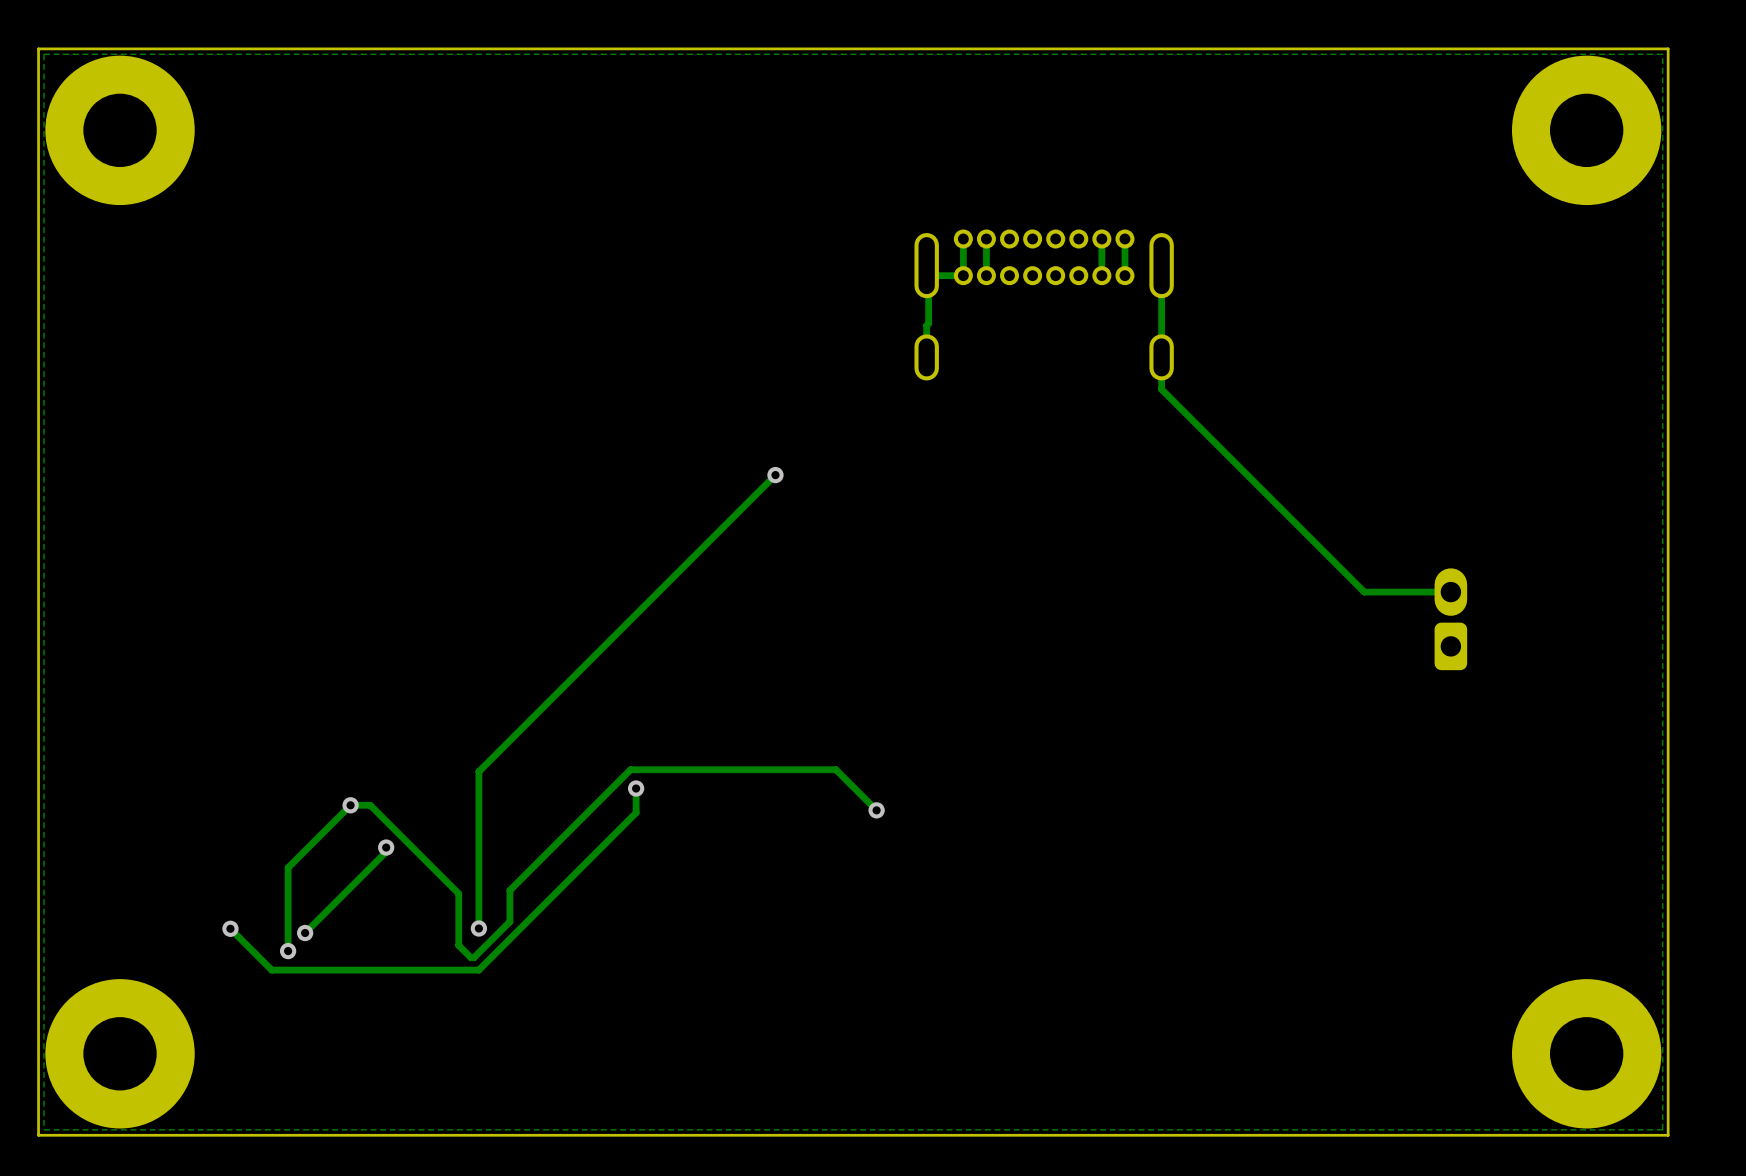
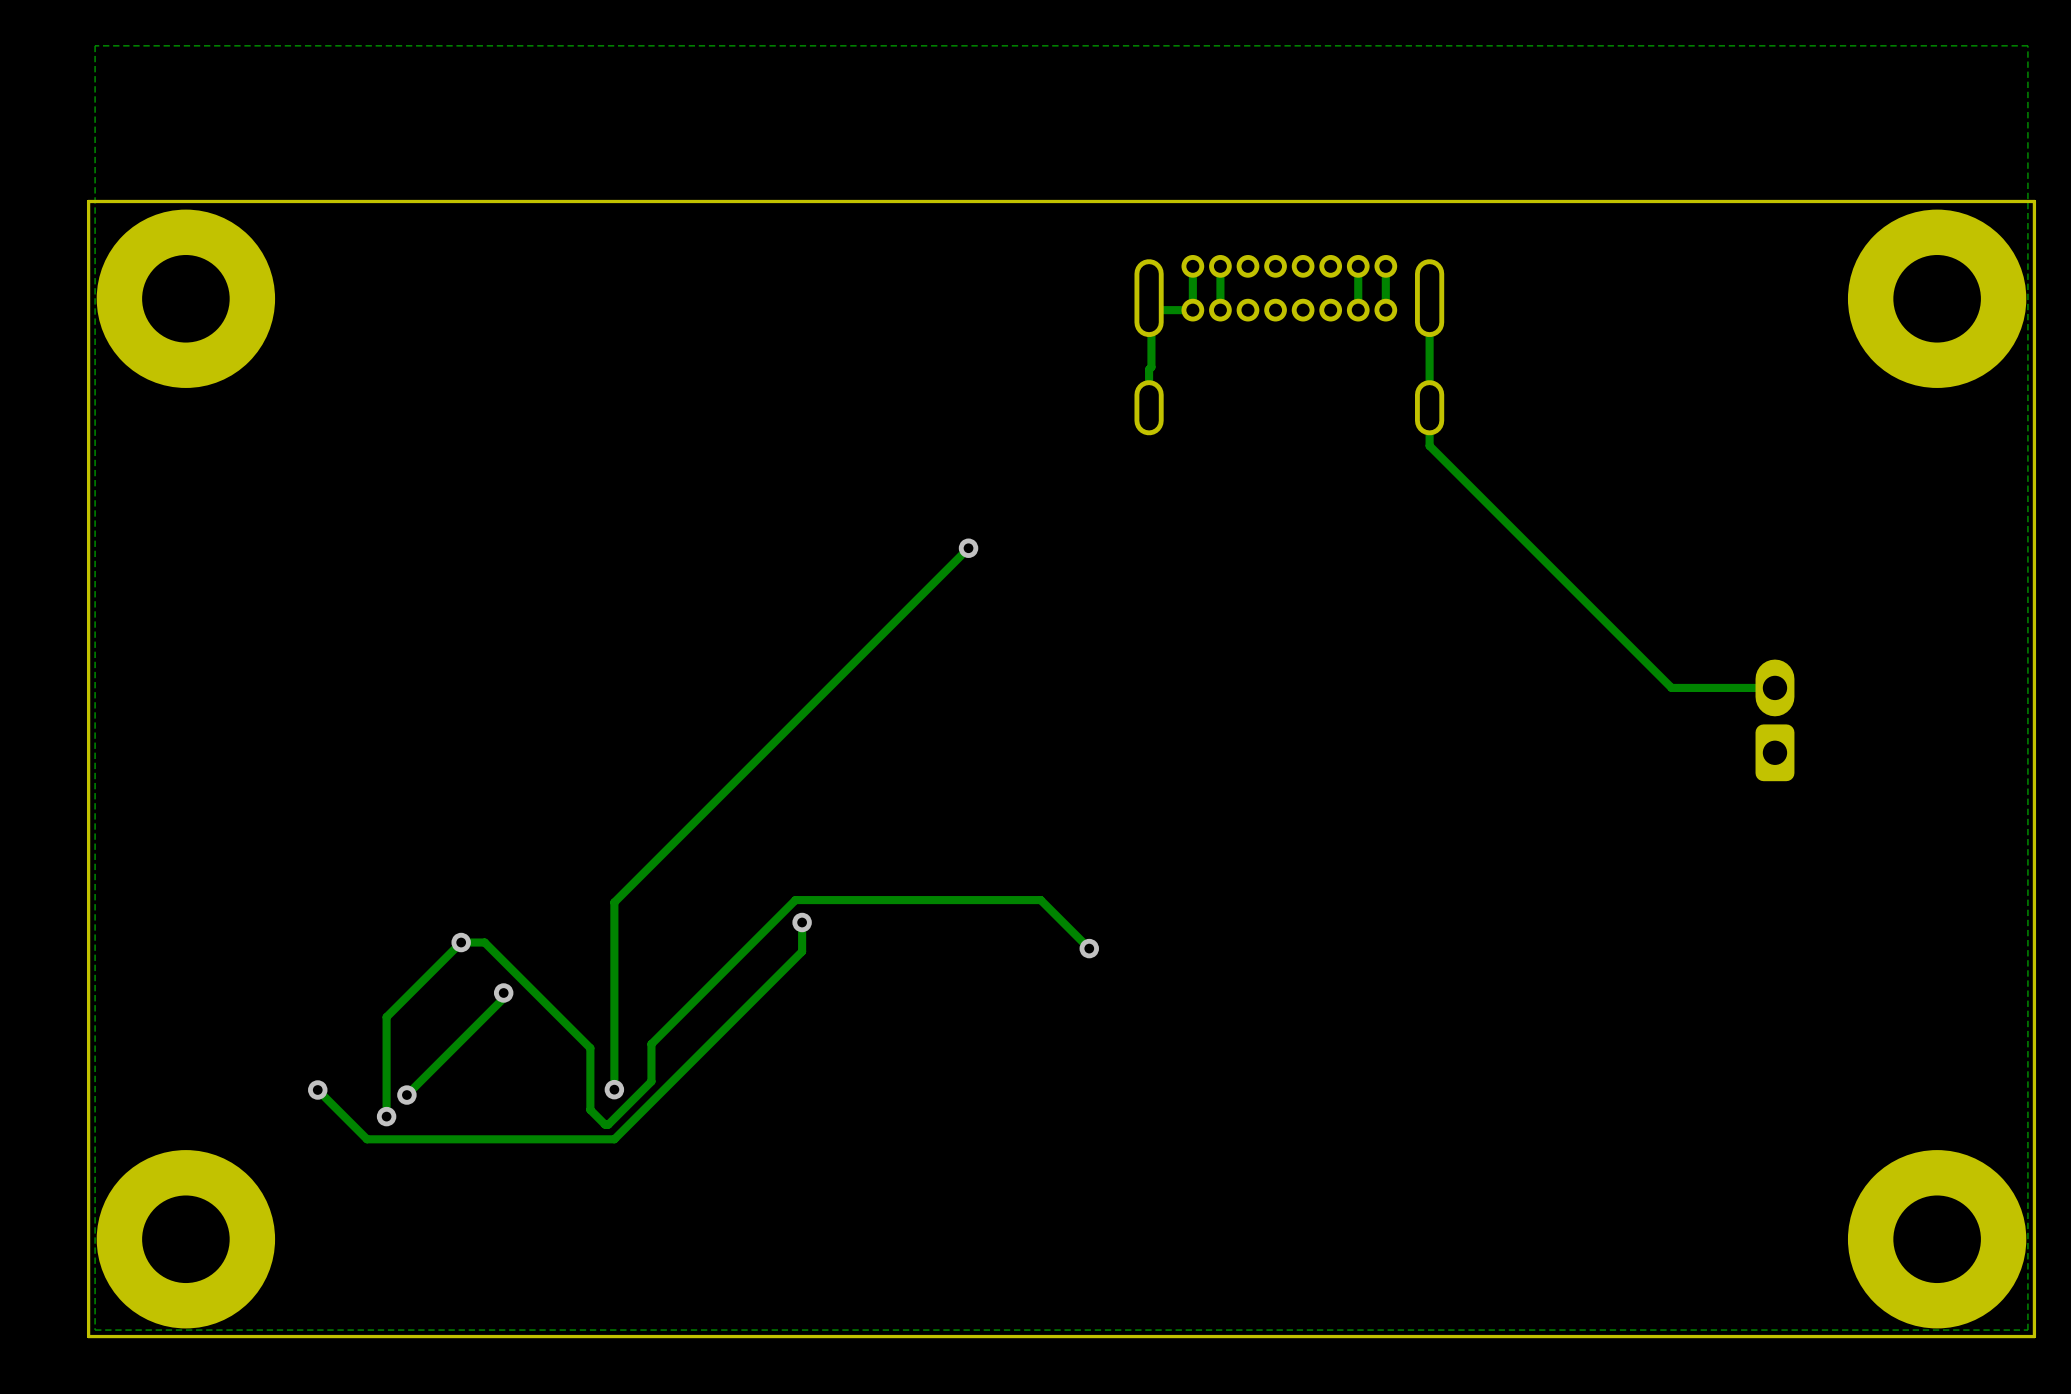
part position: (120, 130) -> (185, 298)
part position: (1586, 130) -> (1937, 298)
board edge: (1668, 184) (1668, 48) (38, 48) (38, 184) -> (2034, 201) (88, 201)

